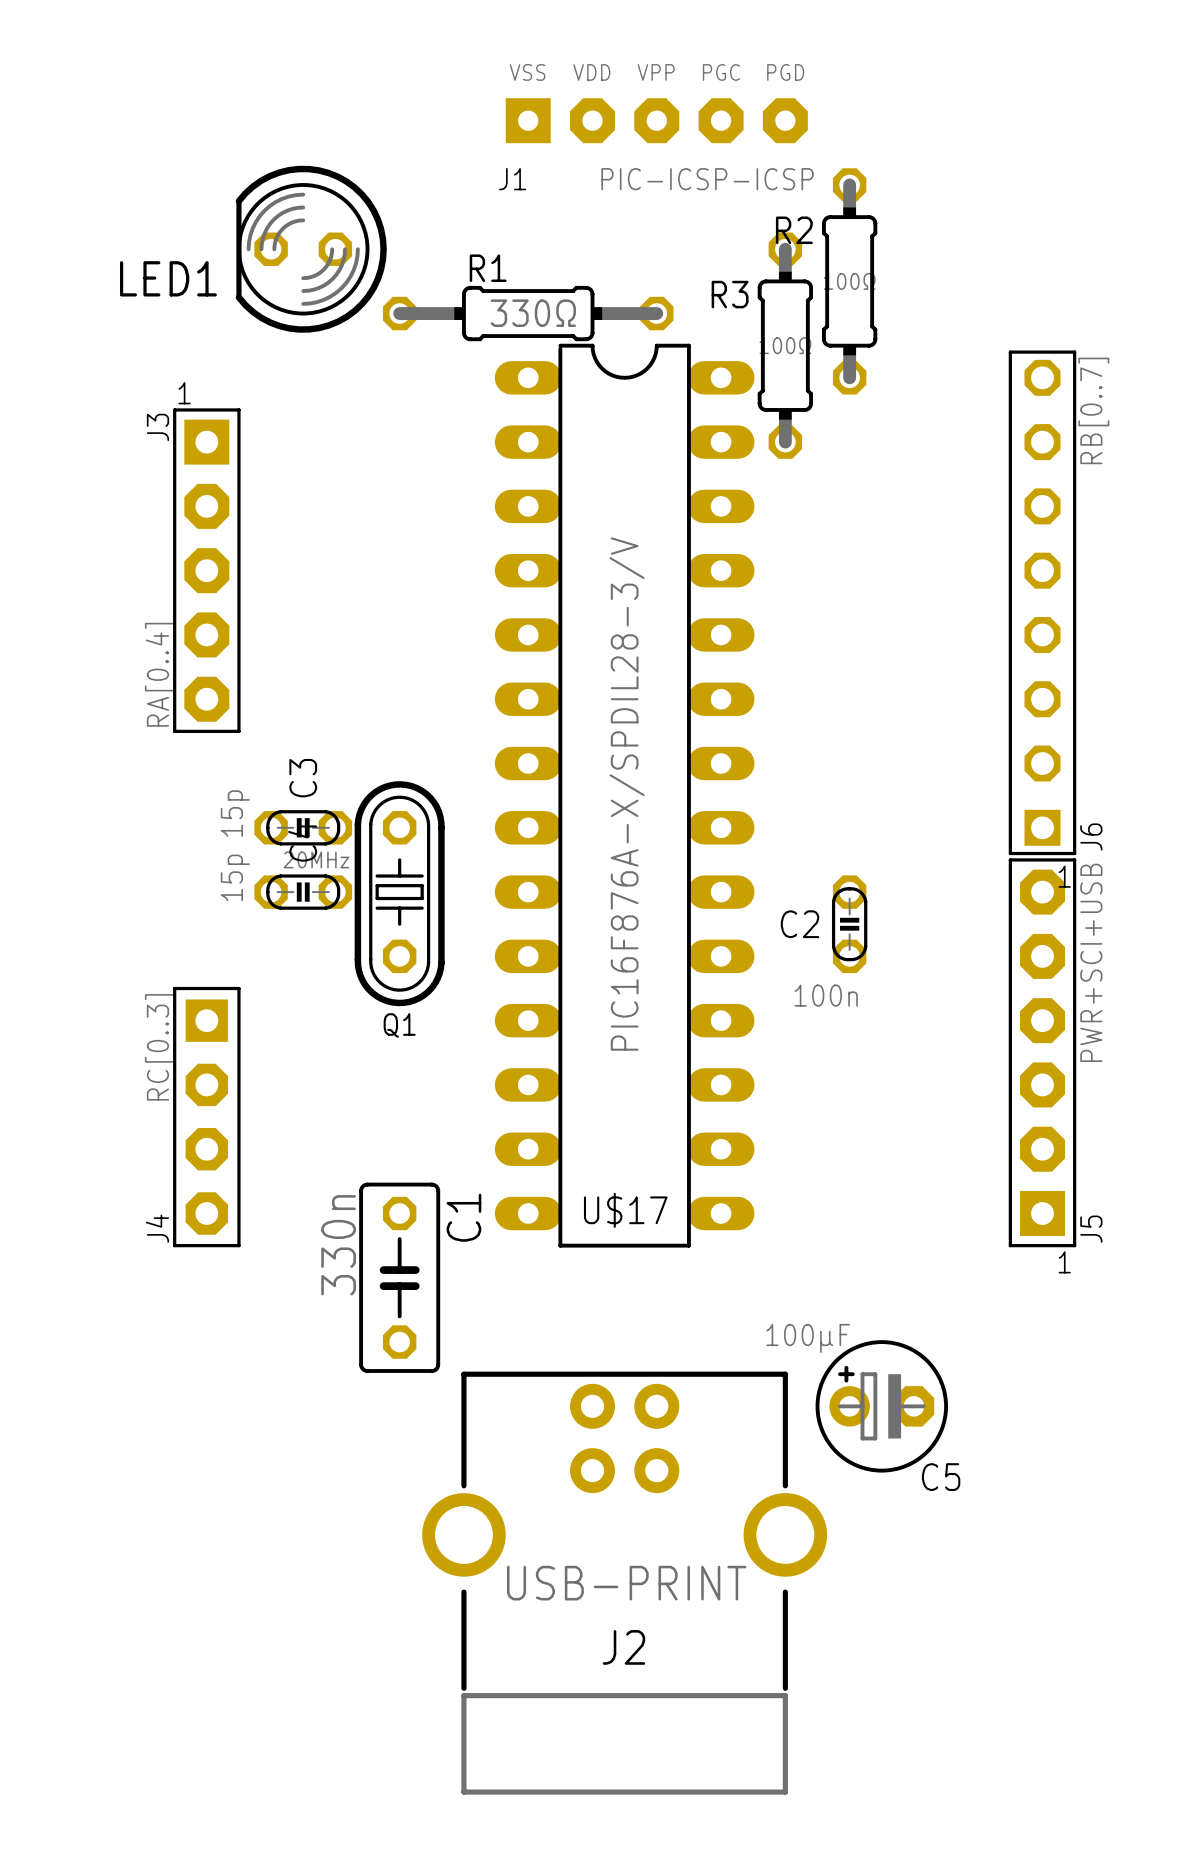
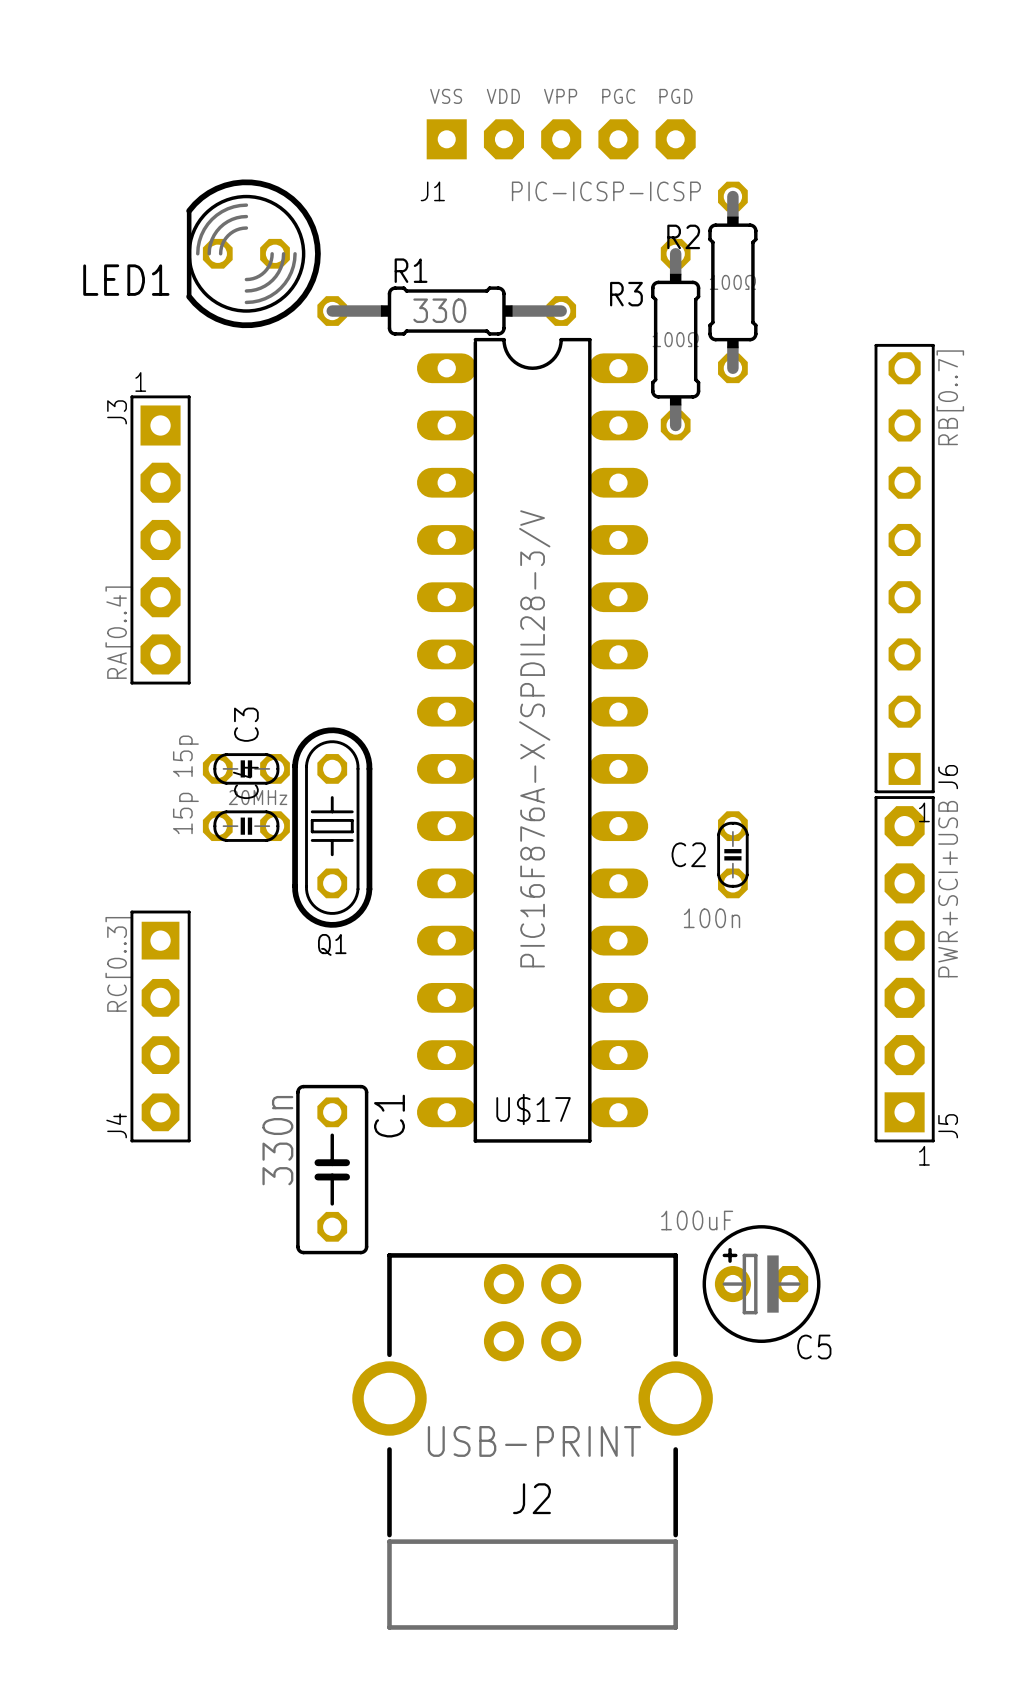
R1 value: 330Ω (533, 313) -> 330 (439, 310)
C5 value: 100μF (808, 1338) -> 100uF (697, 1220)

